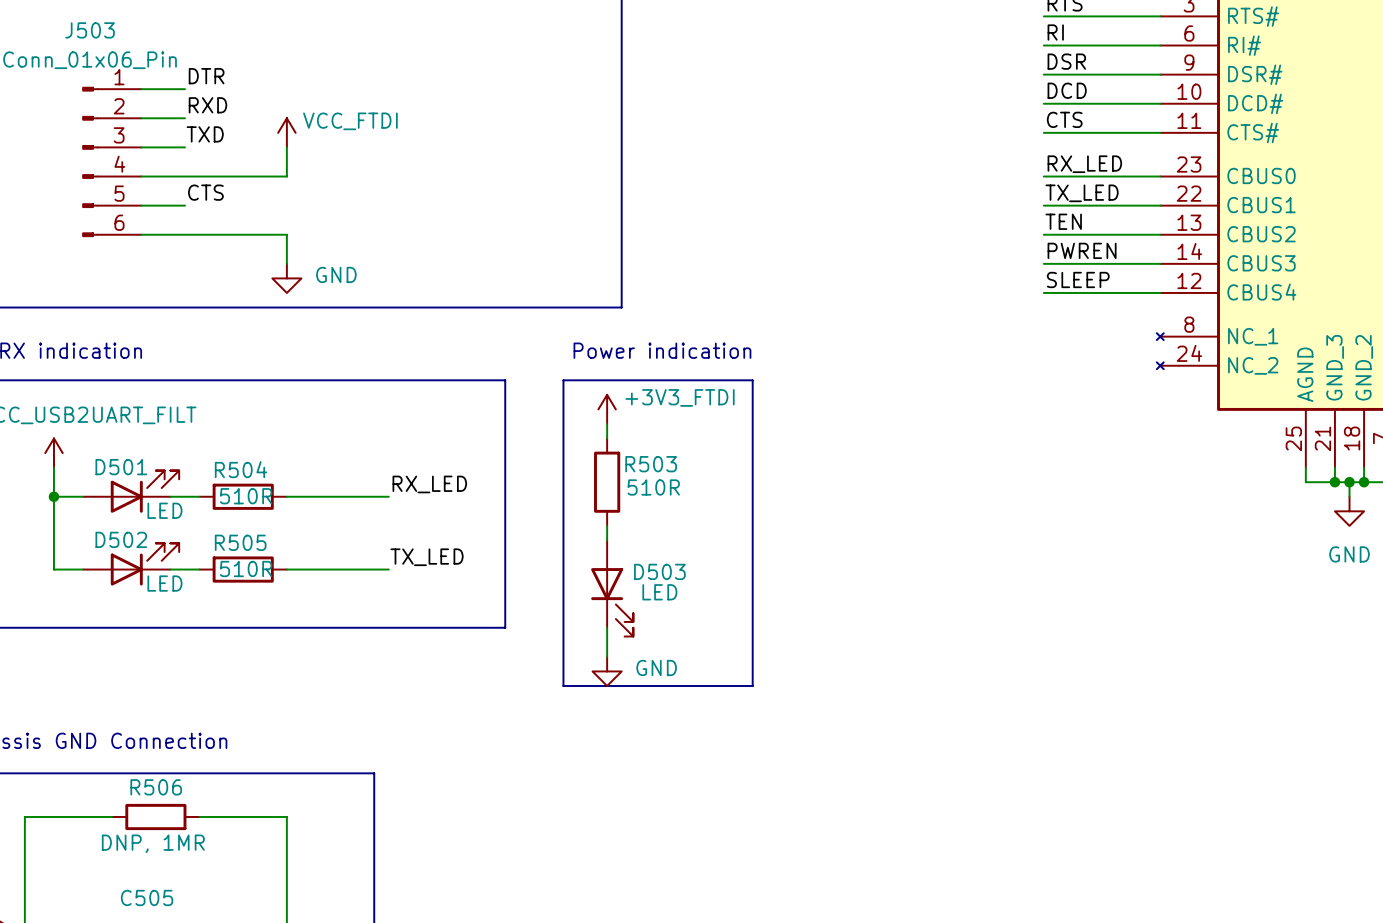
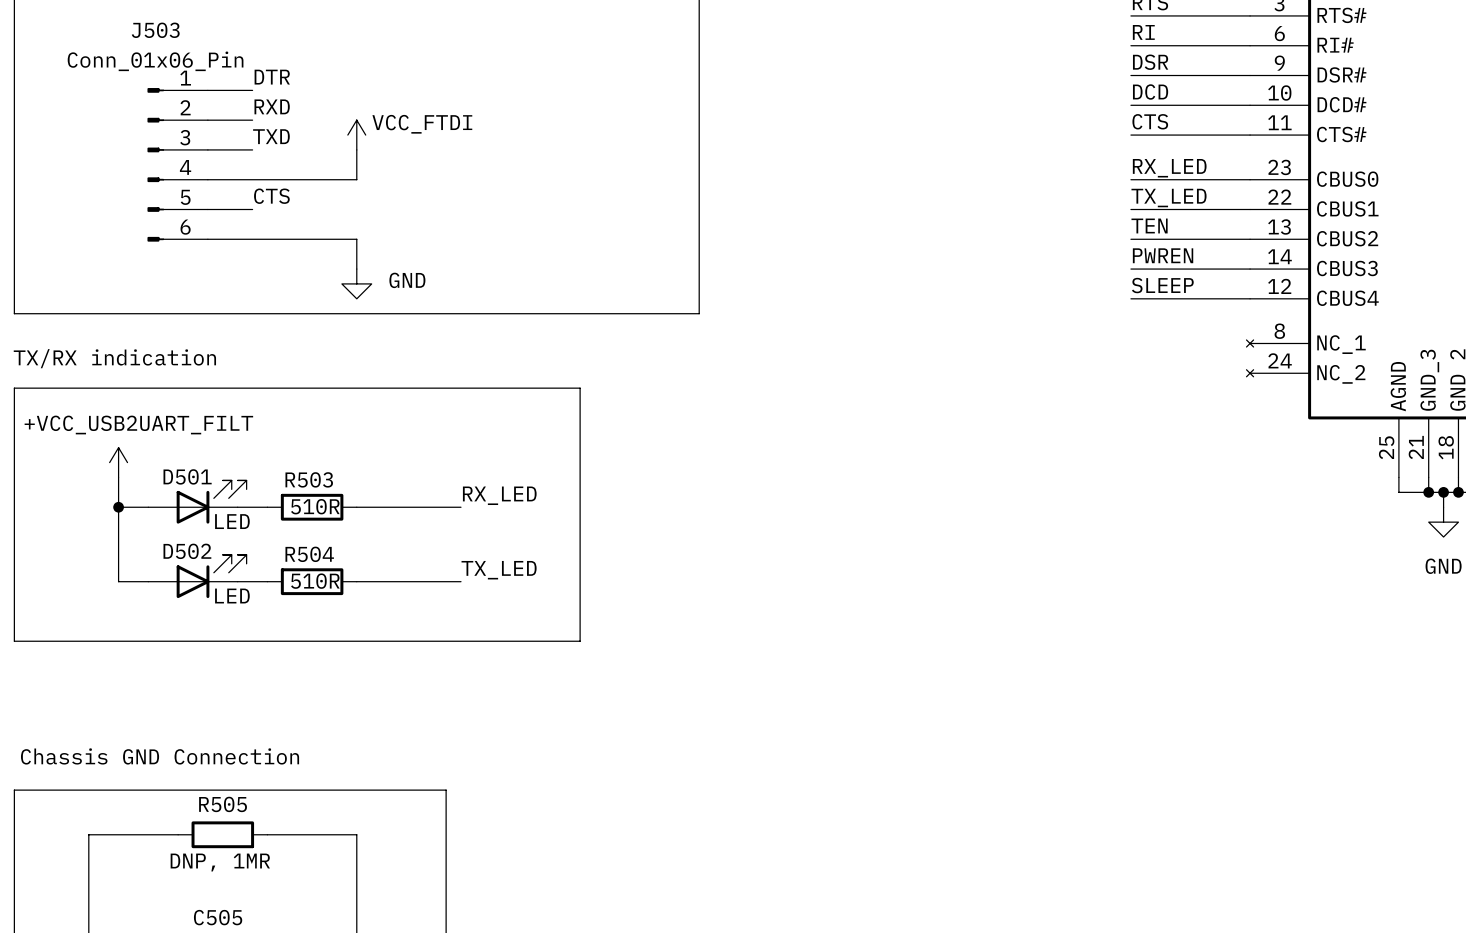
text: Power indication (662, 350) -> none
line: (563, 380) (752, 380) (752, 685) (563, 685) (563, 380) -> none
power symbol: +3V3_FTDI (607, 409) -> none
wire: (607, 423) (607, 438) -> none
R504 name: R504 (241, 469) -> R503 (309, 479)
R503: 510R (607, 482) -> none
wire: (607, 525) (607, 540) -> none
R505 name: R505 (240, 542) -> R504 (309, 554)
D503: LED (612, 588) -> none
wire: (607, 627) (607, 656) -> none
power symbol: GND (607, 671) -> none
R506 name: R506 (156, 787) -> R505 (223, 804)

